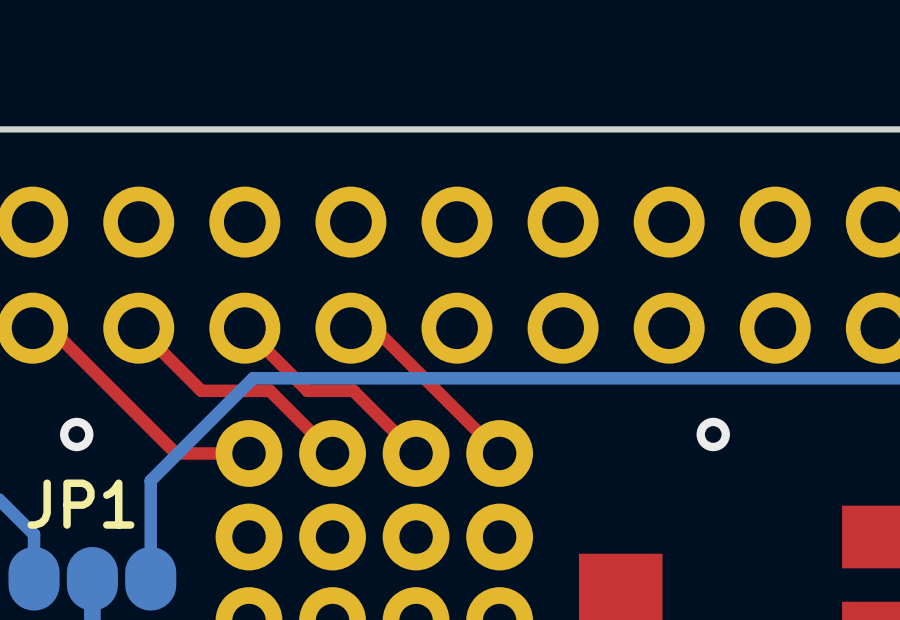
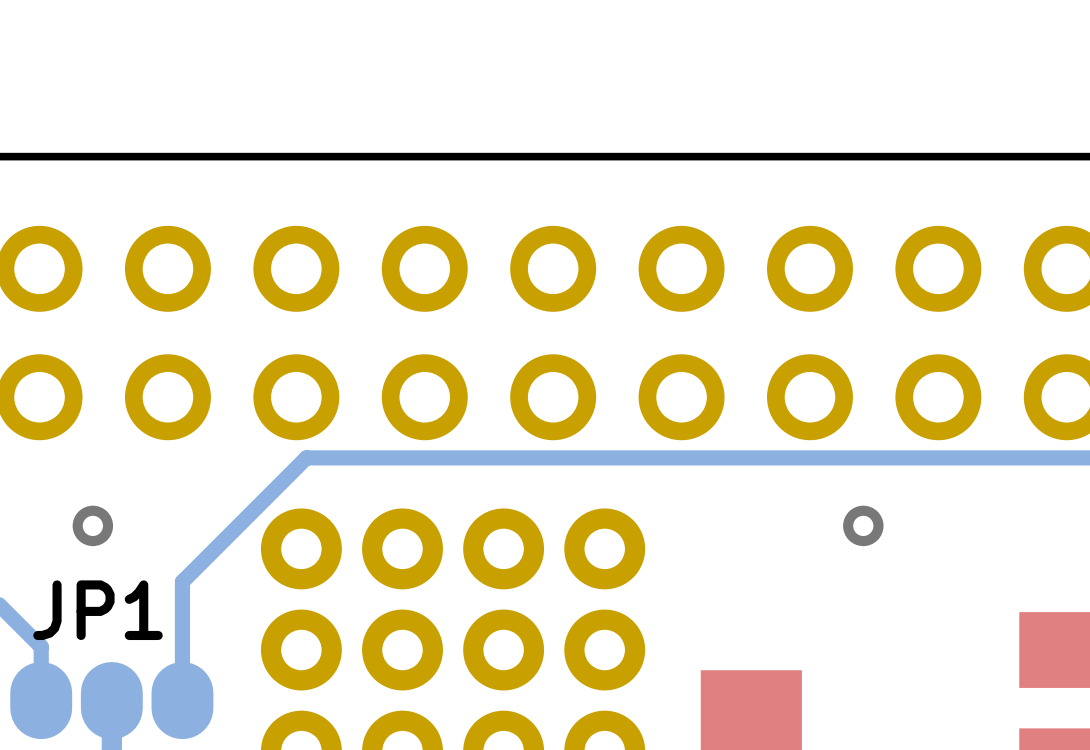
top track: (32, 328) (50, 328) (175, 453) (249, 453) -> none
top track: (138, 328) (201, 390) (269, 390) (332, 453) -> none
top track: (244, 328) (307, 390) (353, 390) (416, 453) -> none
top track: (350, 328) (374, 328) (499, 453) -> none

